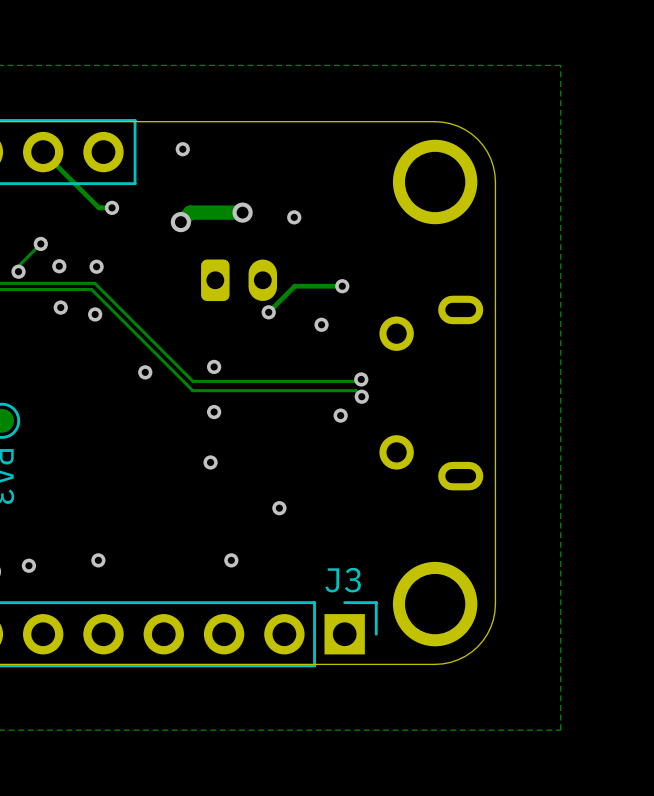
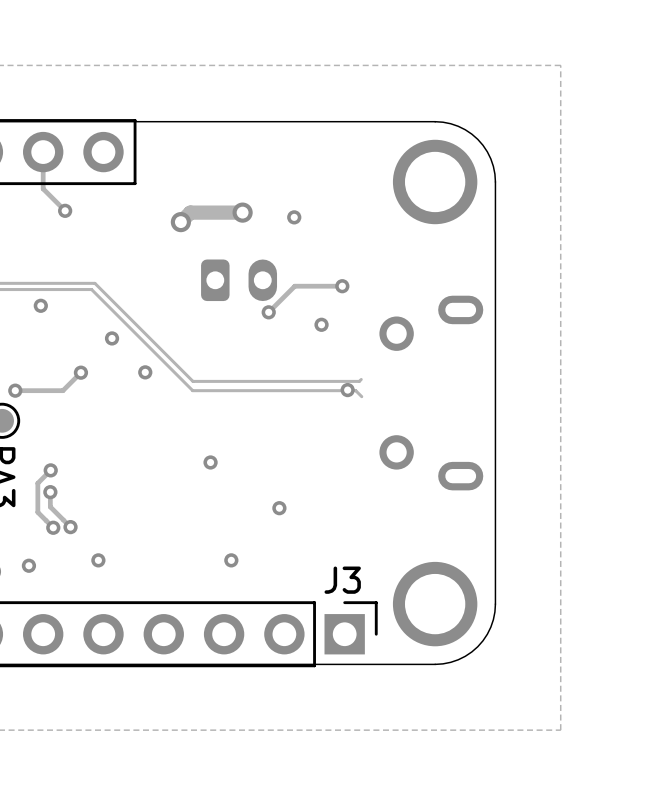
via: (182, 149) -> none
track: (43, 152) (98, 207) (112, 207) -> (43, 152) (43, 188) (65, 210)
via: (112, 207) -> none
via: none -> (65, 210)
track: (40, 243) (18, 266) (18, 271) -> none
via: (40, 243) -> none
via: (59, 266) -> none
via: (96, 266) -> none
via: (18, 271) -> none
via position: (60, 307) -> (40, 305)
via: (95, 314) -> none
via: none -> (112, 338)
via: (214, 366) -> none
track: none -> (80, 372) (62, 390) (15, 390)
via: none -> (80, 372)
via: (361, 379) -> none
via: none -> (15, 390)
via: none -> (347, 390)
via: (361, 396) -> none
via: (214, 412) -> none
via: (340, 415) -> none
track: none -> (50, 470) (37, 483) (37, 512) (53, 527)
via: none -> (50, 470)
track: none -> (50, 492) (50, 506) (70, 527)
via: none -> (50, 492)
via: none -> (53, 527)
via: none -> (70, 527)

